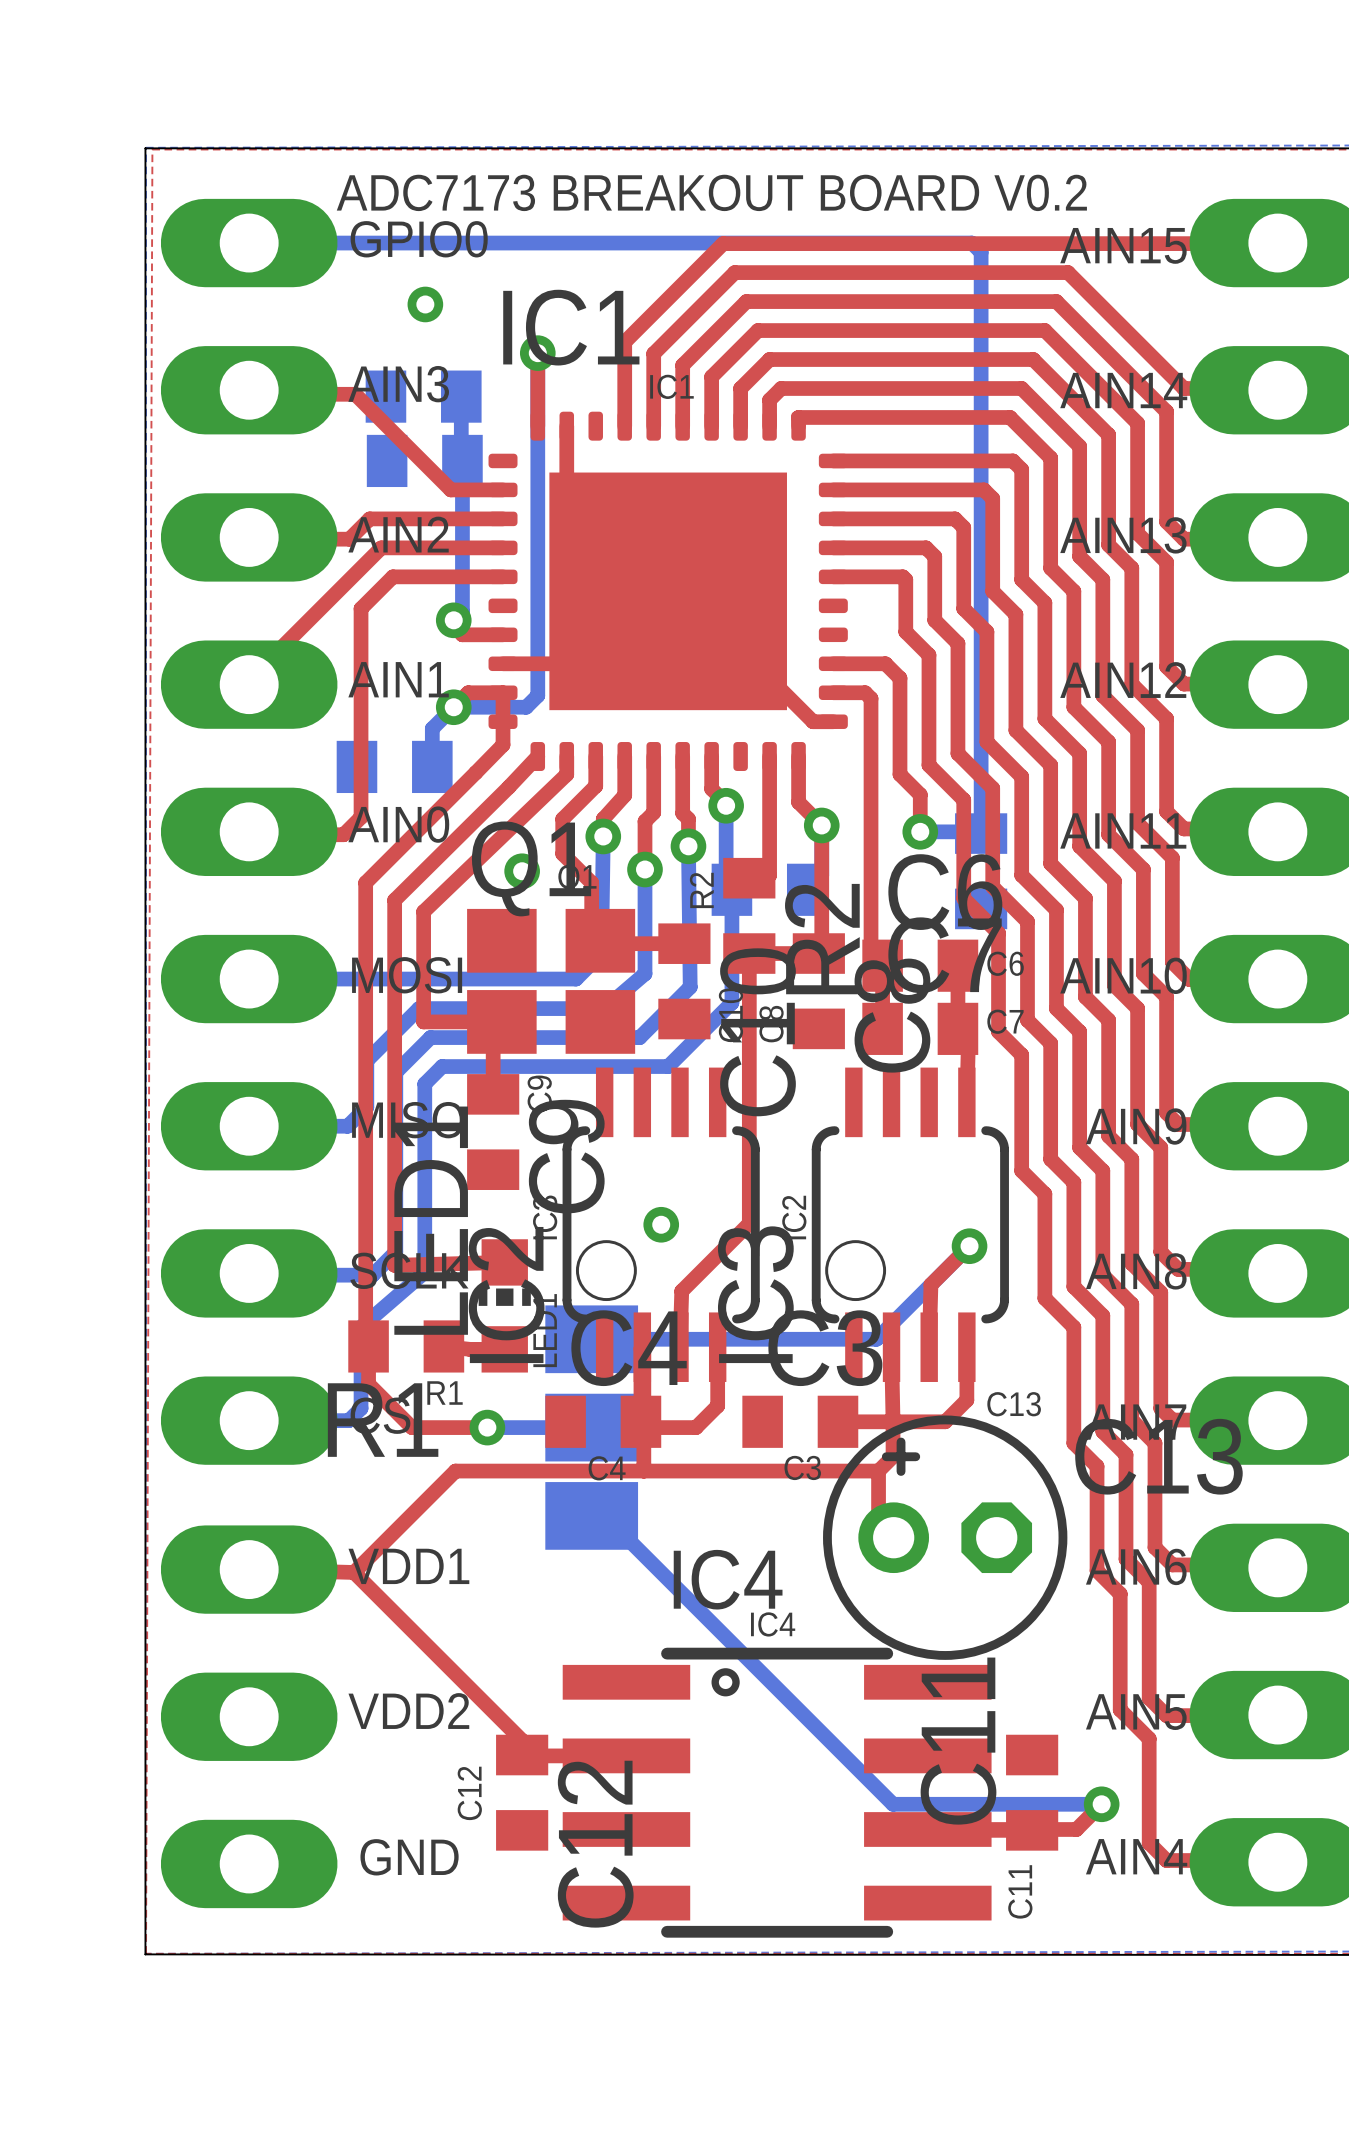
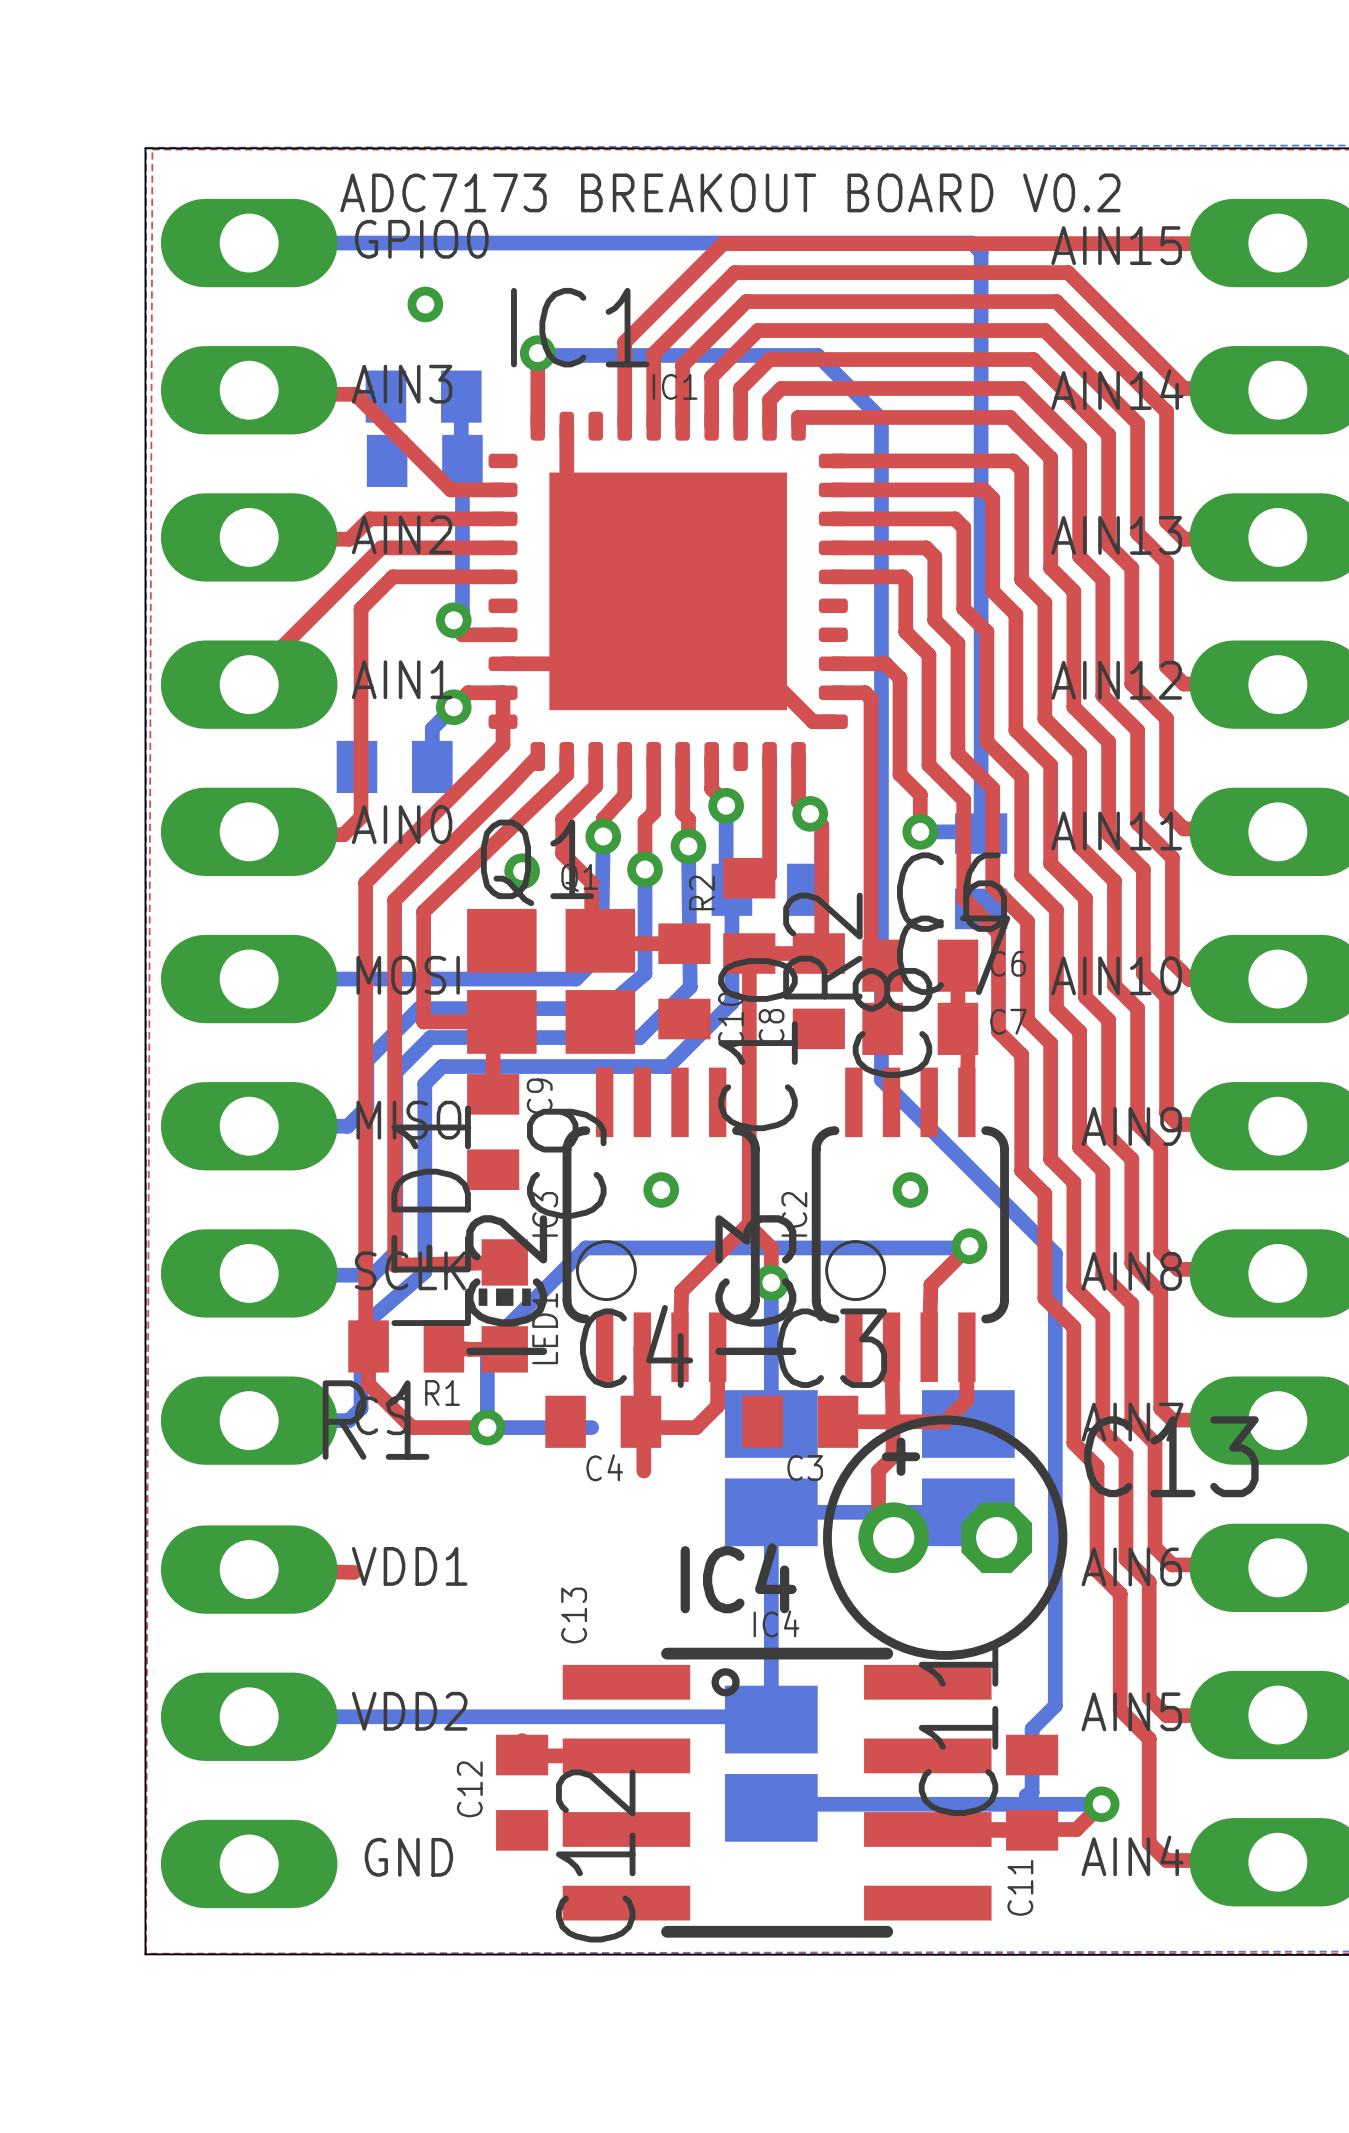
bottom track: (537, 353) (537, 695) (526, 707) (453, 707) -> none
bottom track: none -> (539, 355) (817, 355) (881, 419) (881, 1079) (1055, 1253) (1055, 1705) (1032, 1728) (1032, 1792) (1026, 1795) (1032, 1801)
via position: (821, 825) -> (810, 813)
via: none -> (910, 1189)
via position: (661, 1224) -> (661, 1189)
top track: none -> (748, 1224) (771, 1247) (771, 1282)
bottom track: (967, 1247) (876, 1339) (591, 1339) -> (967, 1247) (585, 1247) (487, 1346) (487, 1427)
bottom track: none -> (771, 1282) (771, 1424)
via: none -> (771, 1282)
text rotation: 0° (1014, 1404) -> 90° counterclockwise (574, 1615)
text position: C13 (1014, 1404) -> C13 (574, 1615)
part: (591, 1427) -> none
part: none -> (771, 1468)
part: none -> (968, 1468)
top track: (878, 1471) (455, 1471) (354, 1572) (522, 1740) -> none
bottom track: none -> (968, 1512) (771, 1512) (771, 1719) (768, 1716) (249, 1716)
bottom track: (591, 1515) (593, 1505) (893, 1804) -> (771, 1807) (771, 1804) (893, 1804)
part: none -> (771, 1763)

